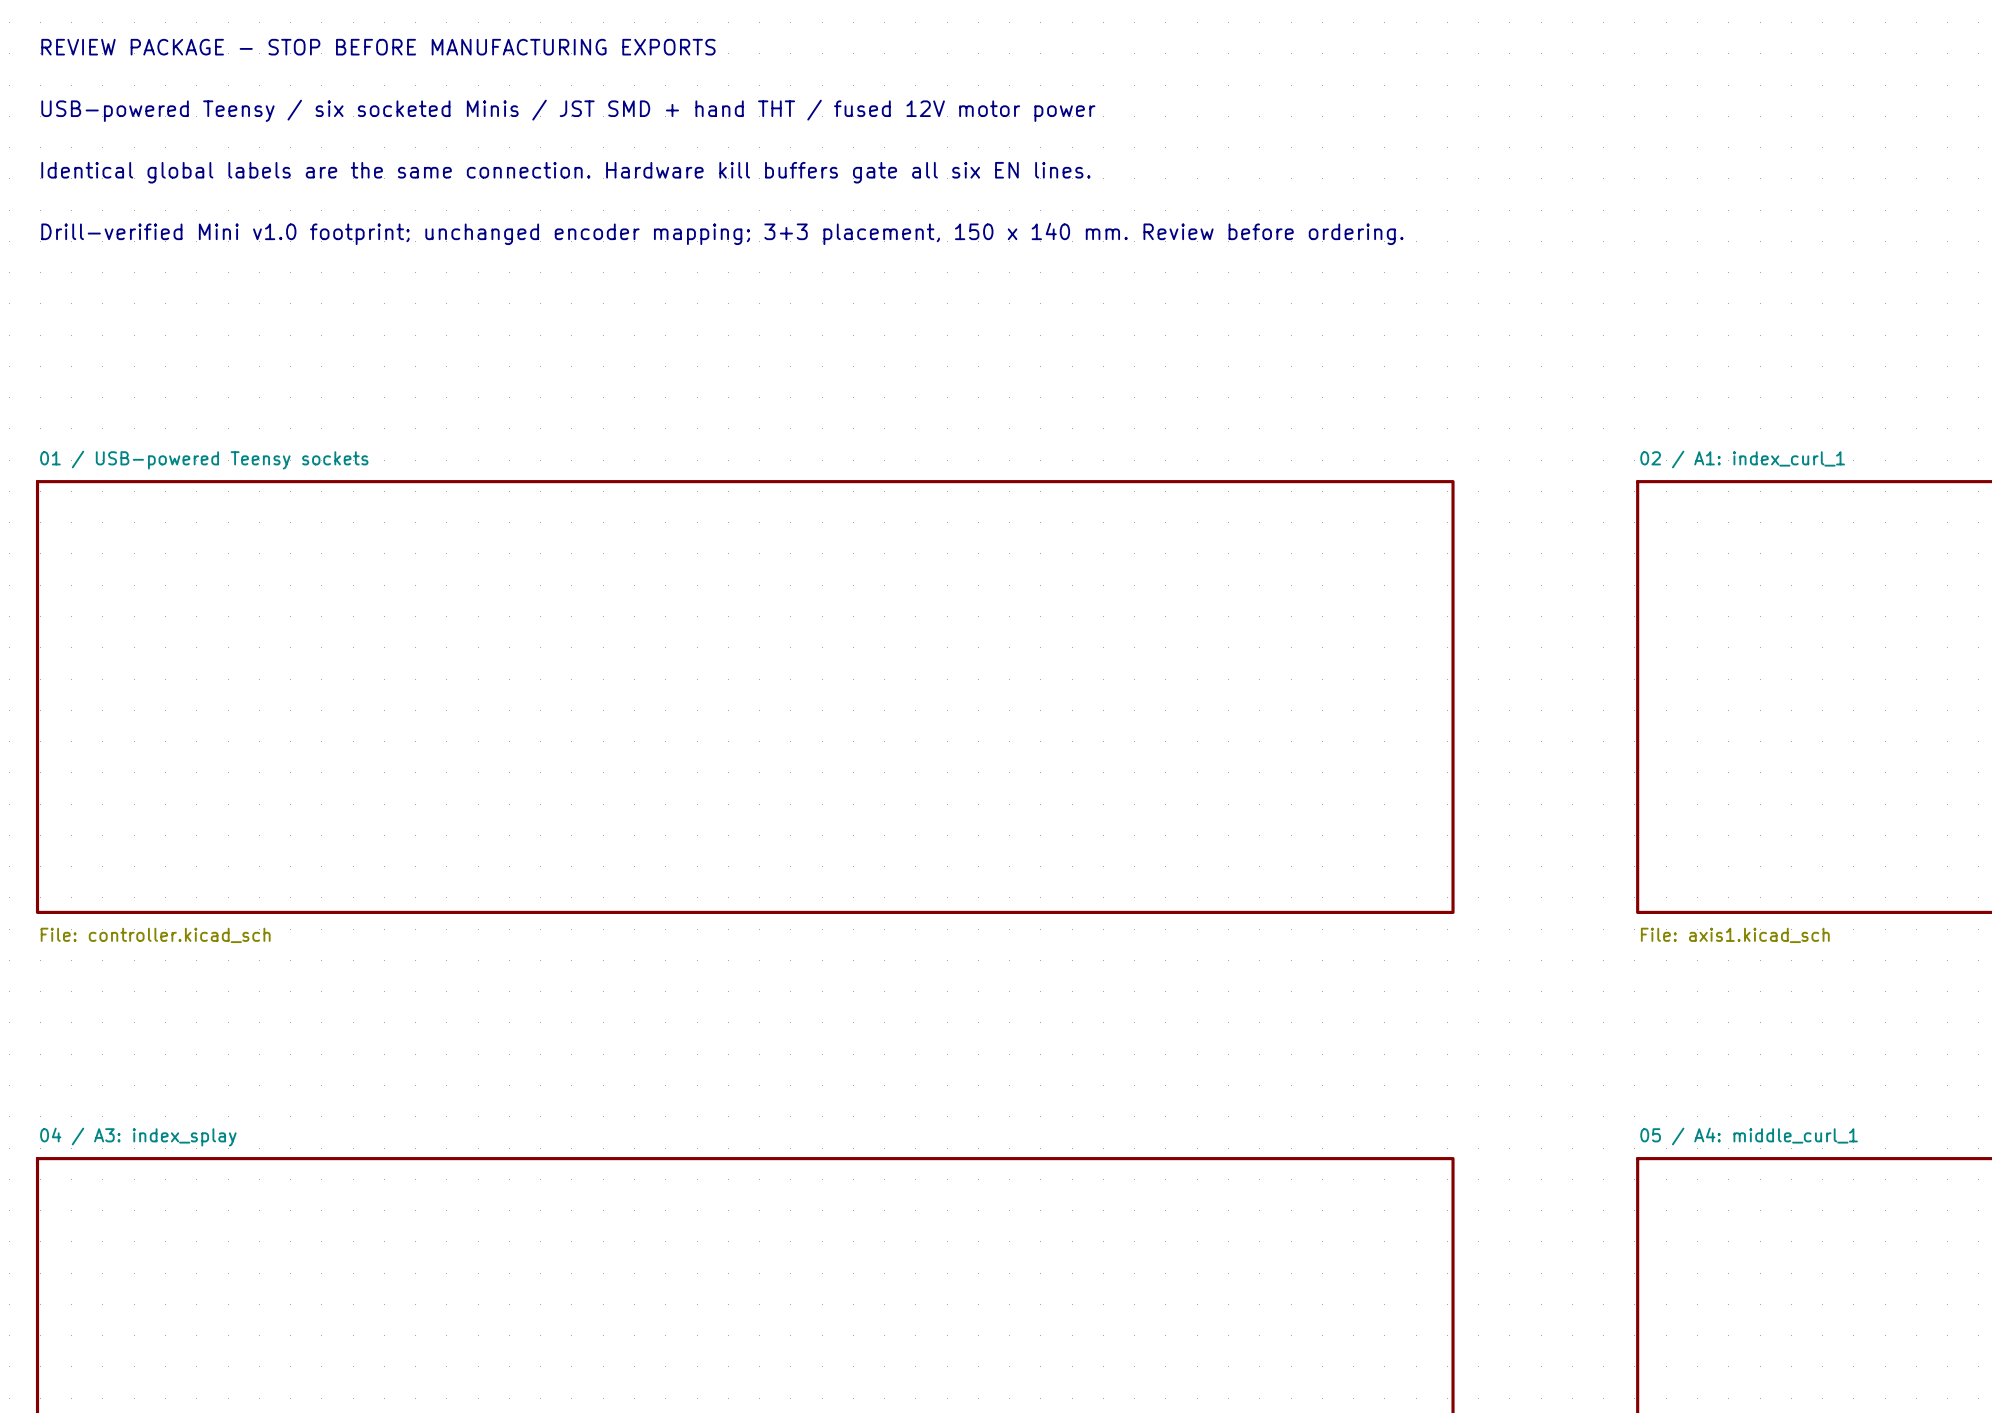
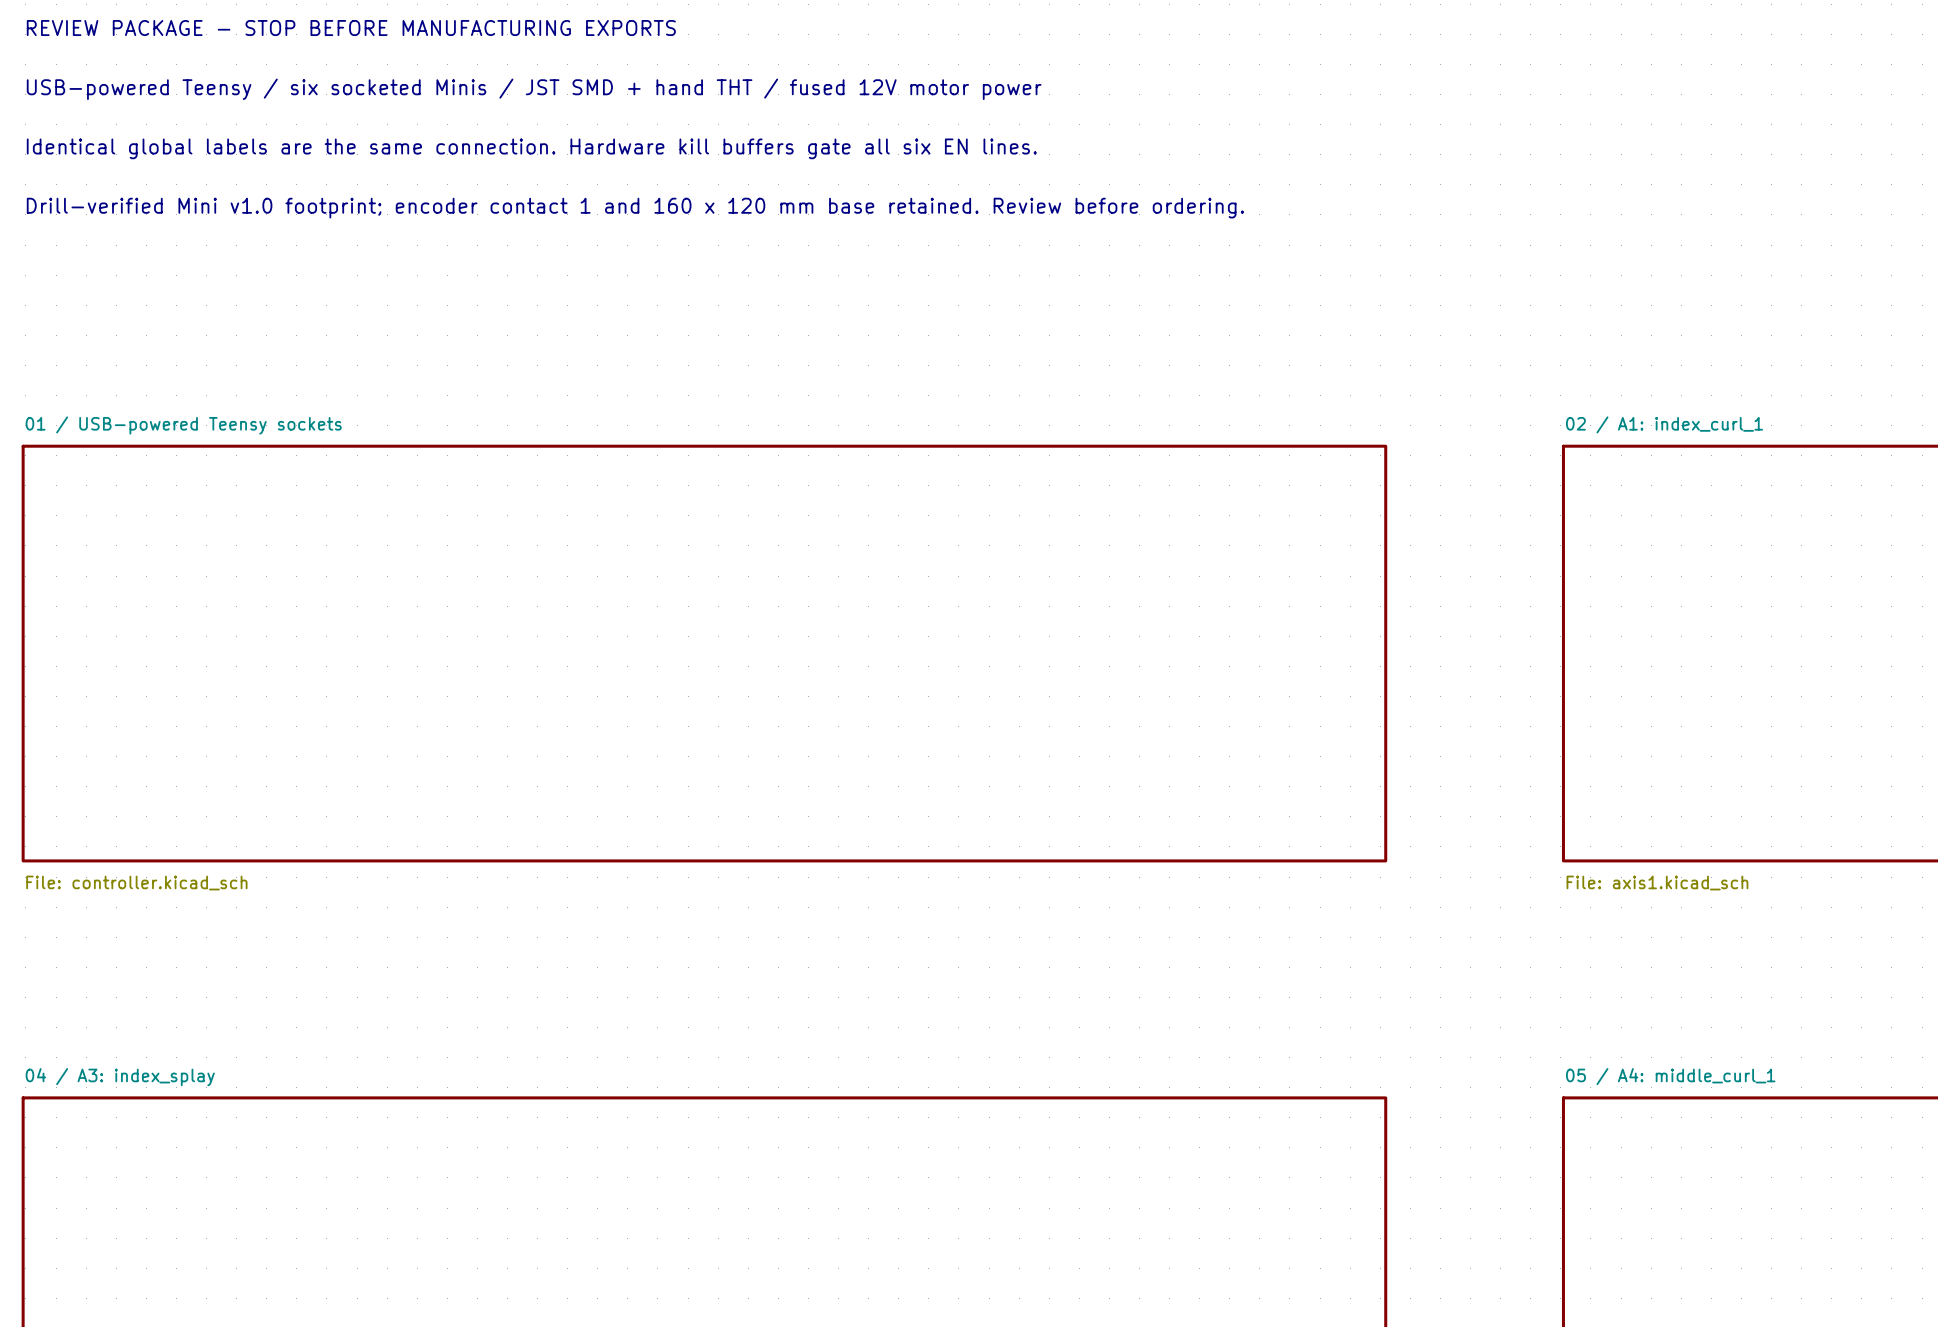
text: Drill-verified Mini v1.0 footprint; unchanged encoder mapping; 3+3 placement, 150 x 140 mm. Review before ordering. (722, 233) -> Drill-verified Mini v1.0 footprint; encoder contact 1 and 160 x 120 mm base retained. Review before ordering. (635, 208)

